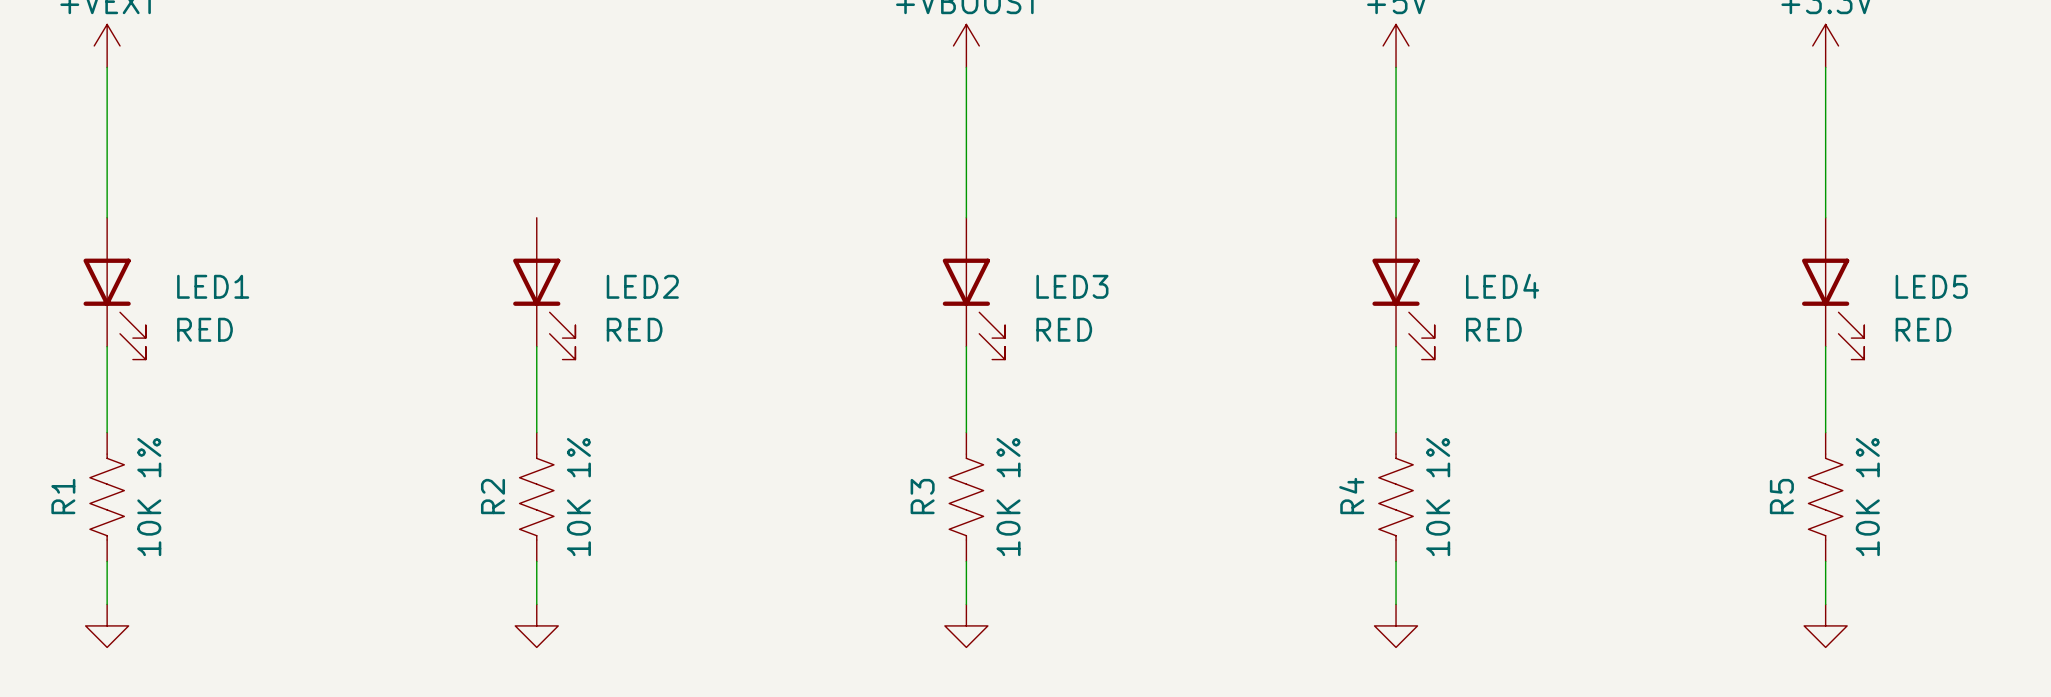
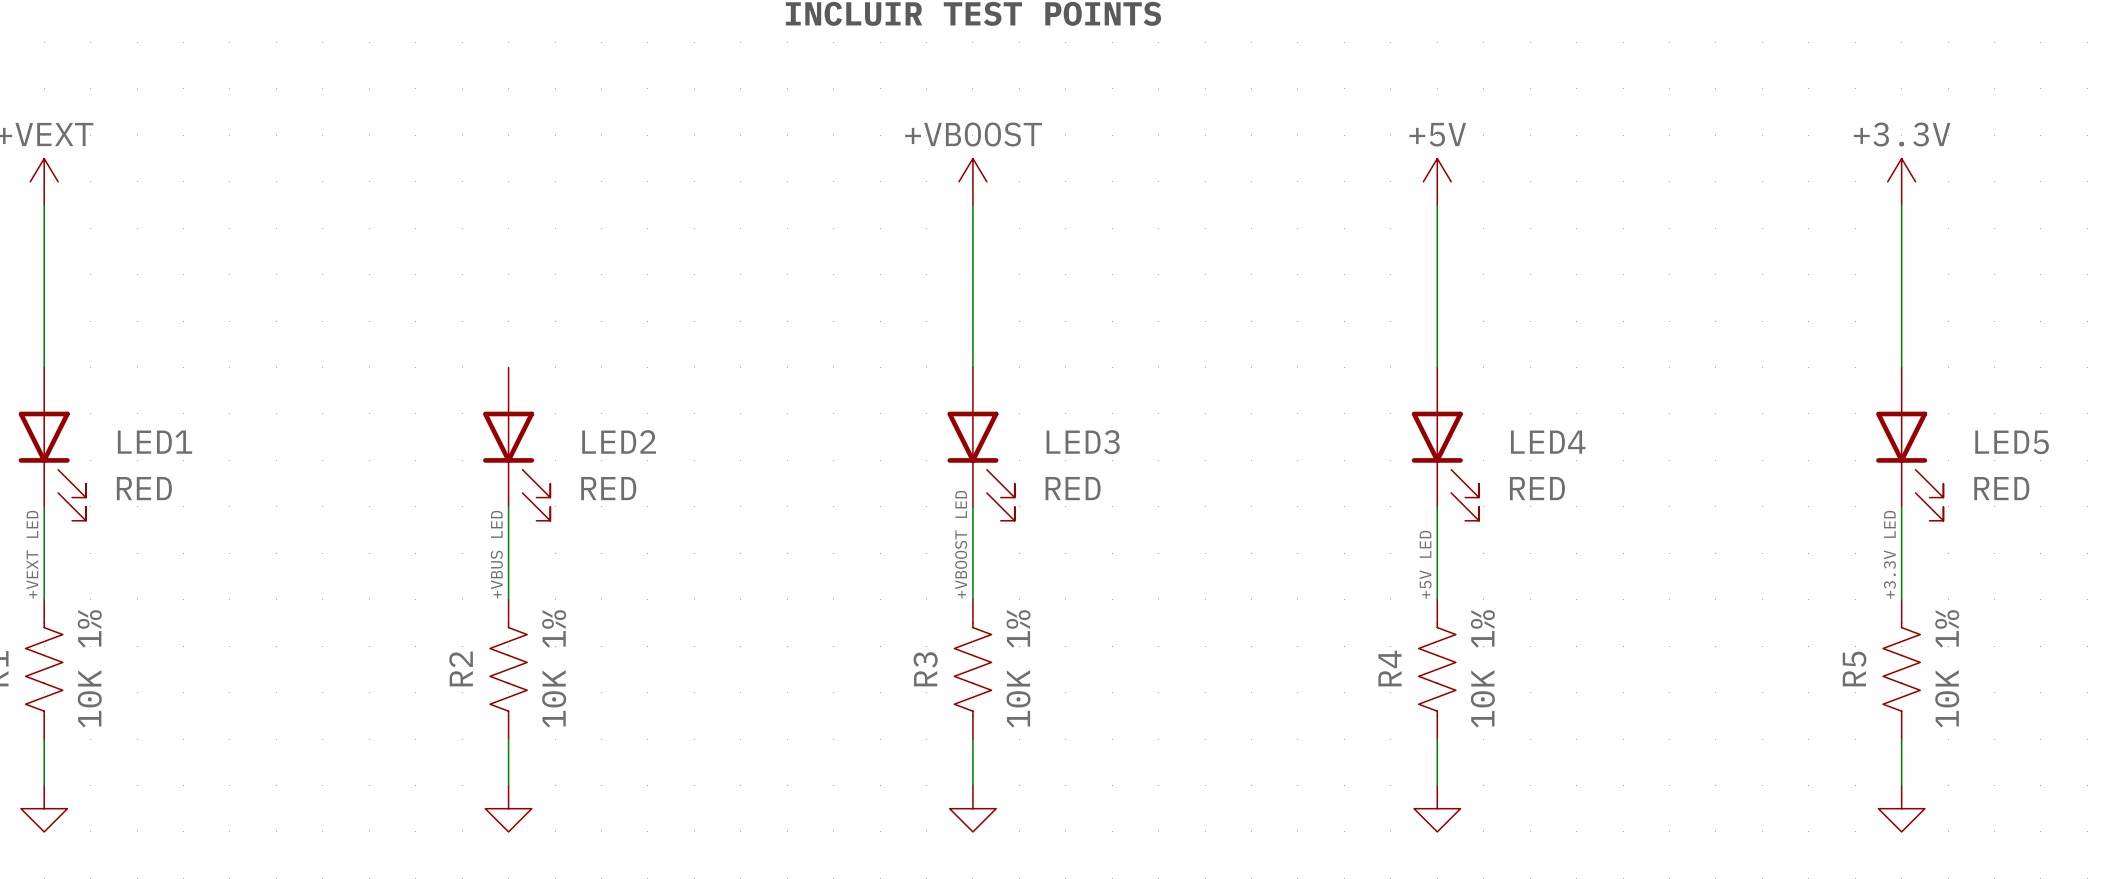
label: none -> +VBOOST LED (961, 544)
label: none -> +VBUS LED (496, 554)
label: none -> +VEXT LED (32, 554)
label: none -> +3.3V LED (1889, 554)
label: none -> +5V LED (1425, 564)

